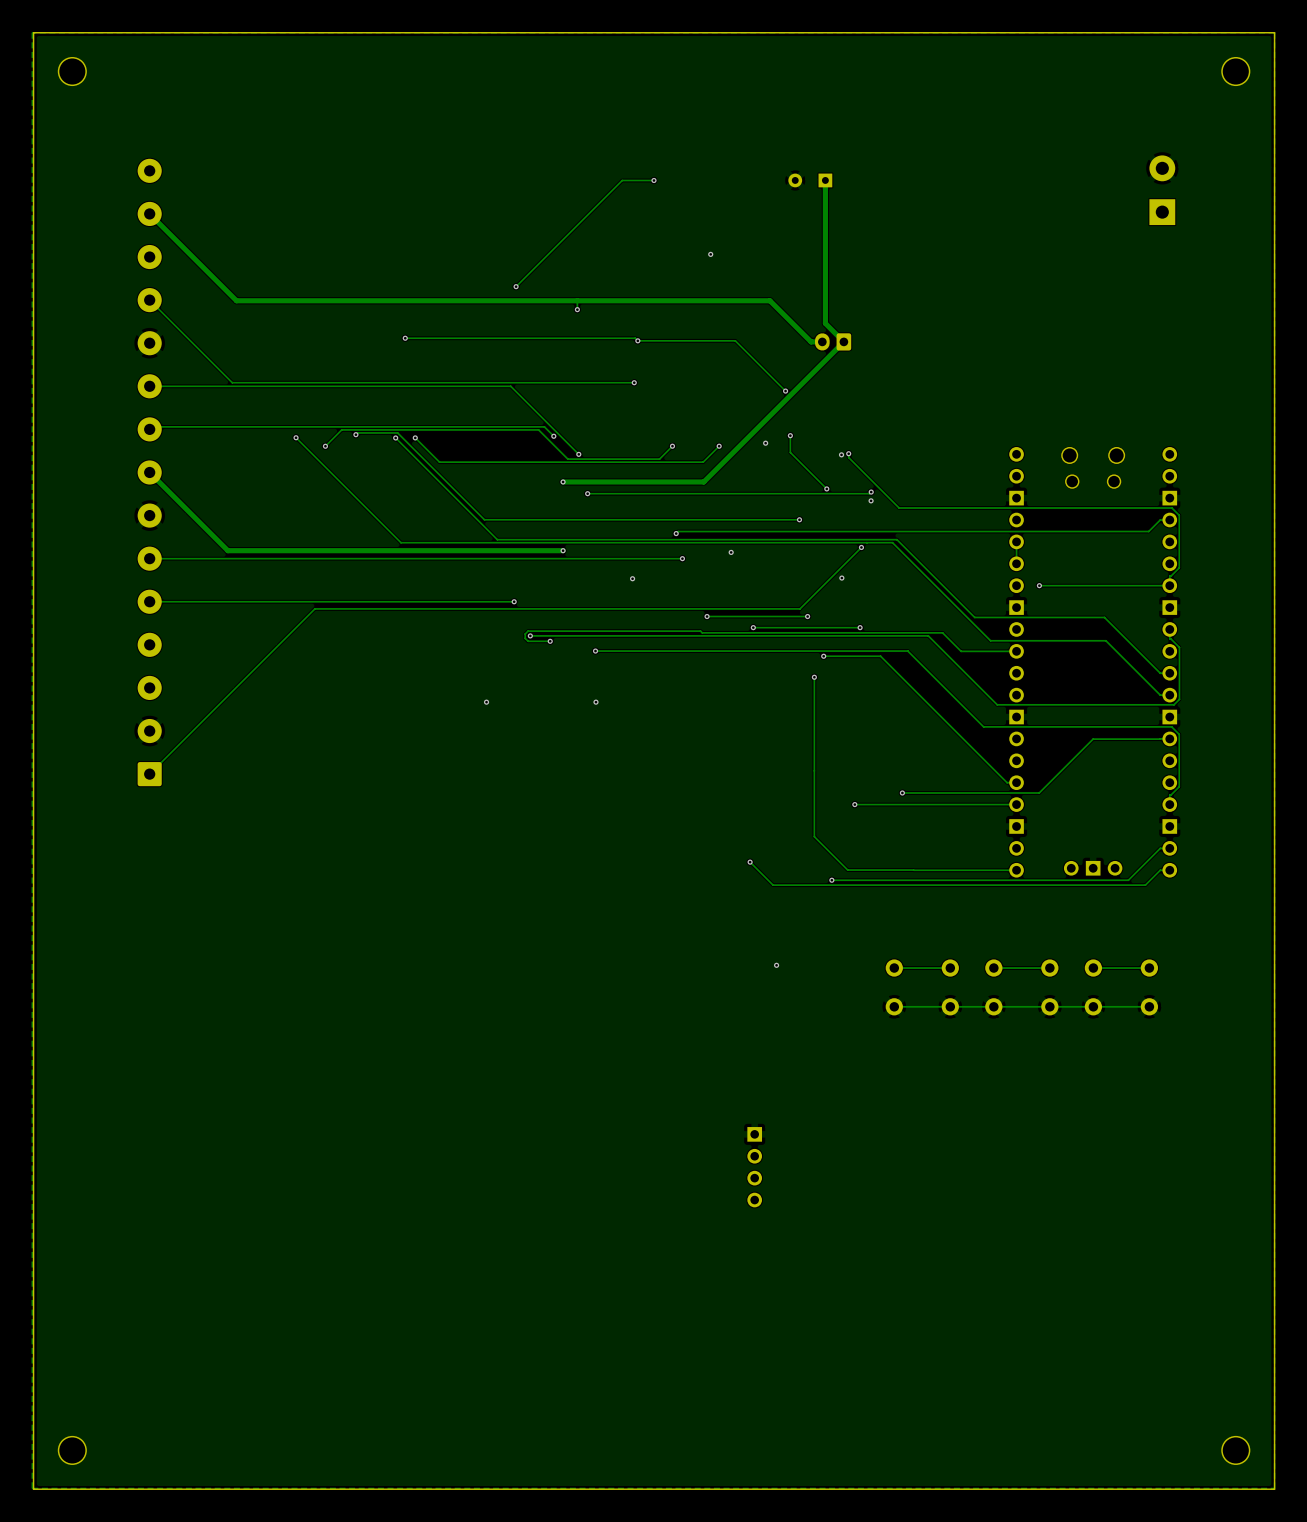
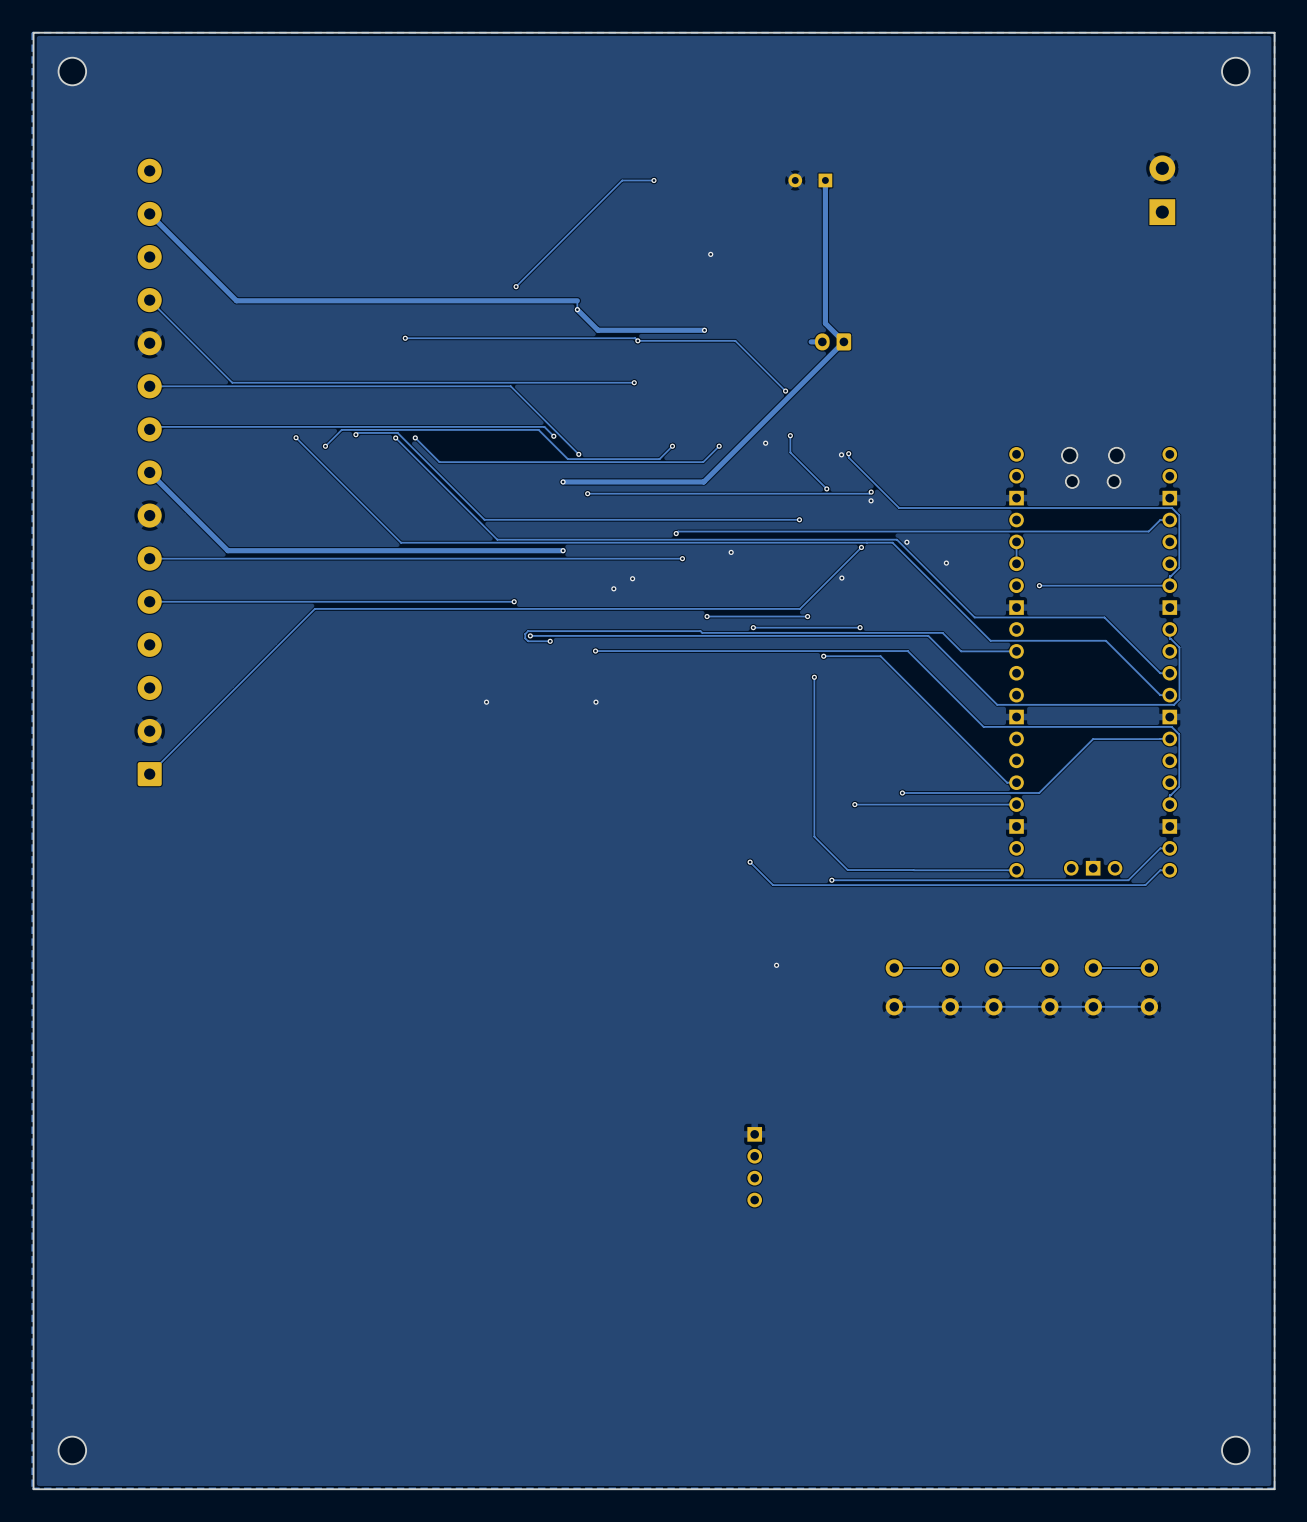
track: (577, 300) (769, 300) (811, 341) -> none
track: none -> (577, 309) (598, 330) (704, 330)
via: none -> (704, 330)
via: none -> (906, 542)
via: none -> (946, 563)
via: none -> (613, 588)

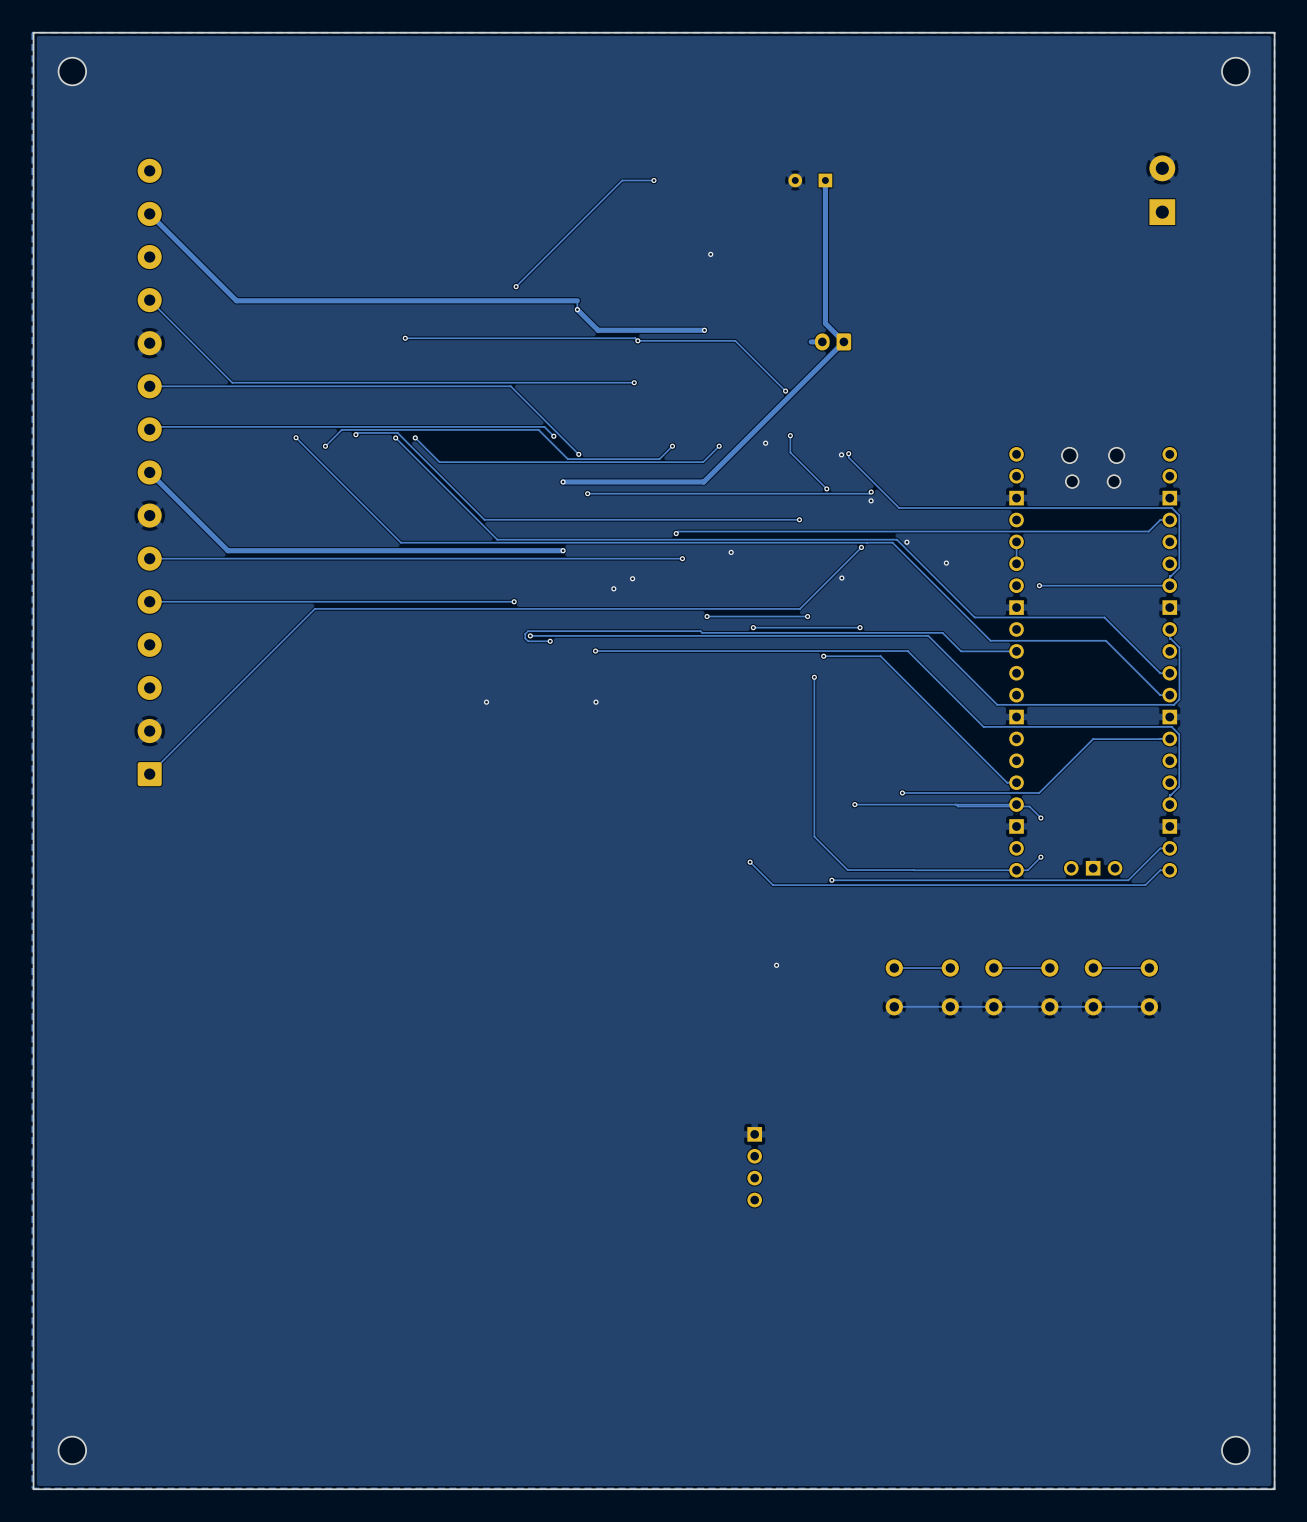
track: none -> (955, 804) (957, 806) (1029, 806) (1040, 817)
via: none -> (1040, 817)
track: none -> (1040, 857) (1027, 870) (1016, 870)
via: none -> (1040, 857)

